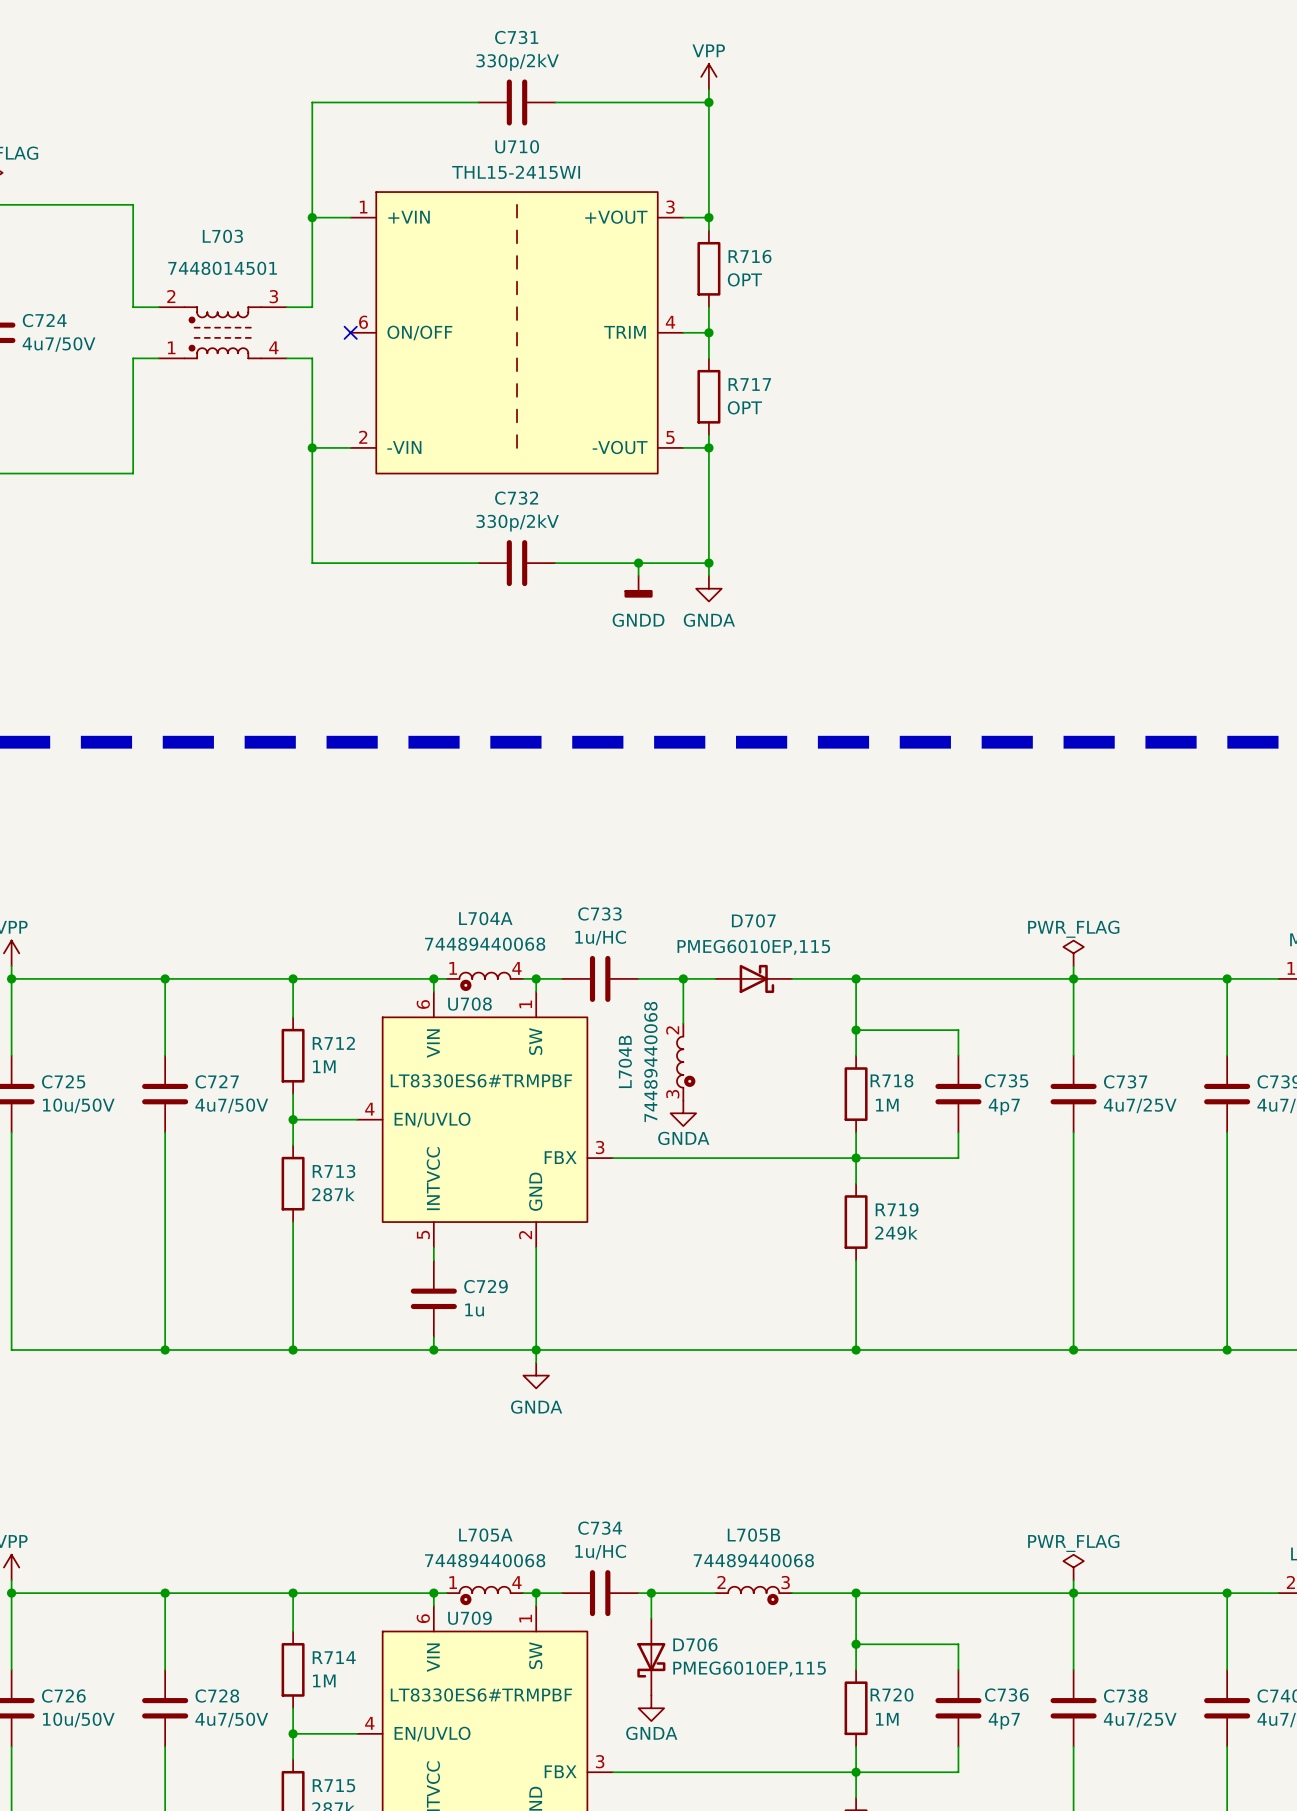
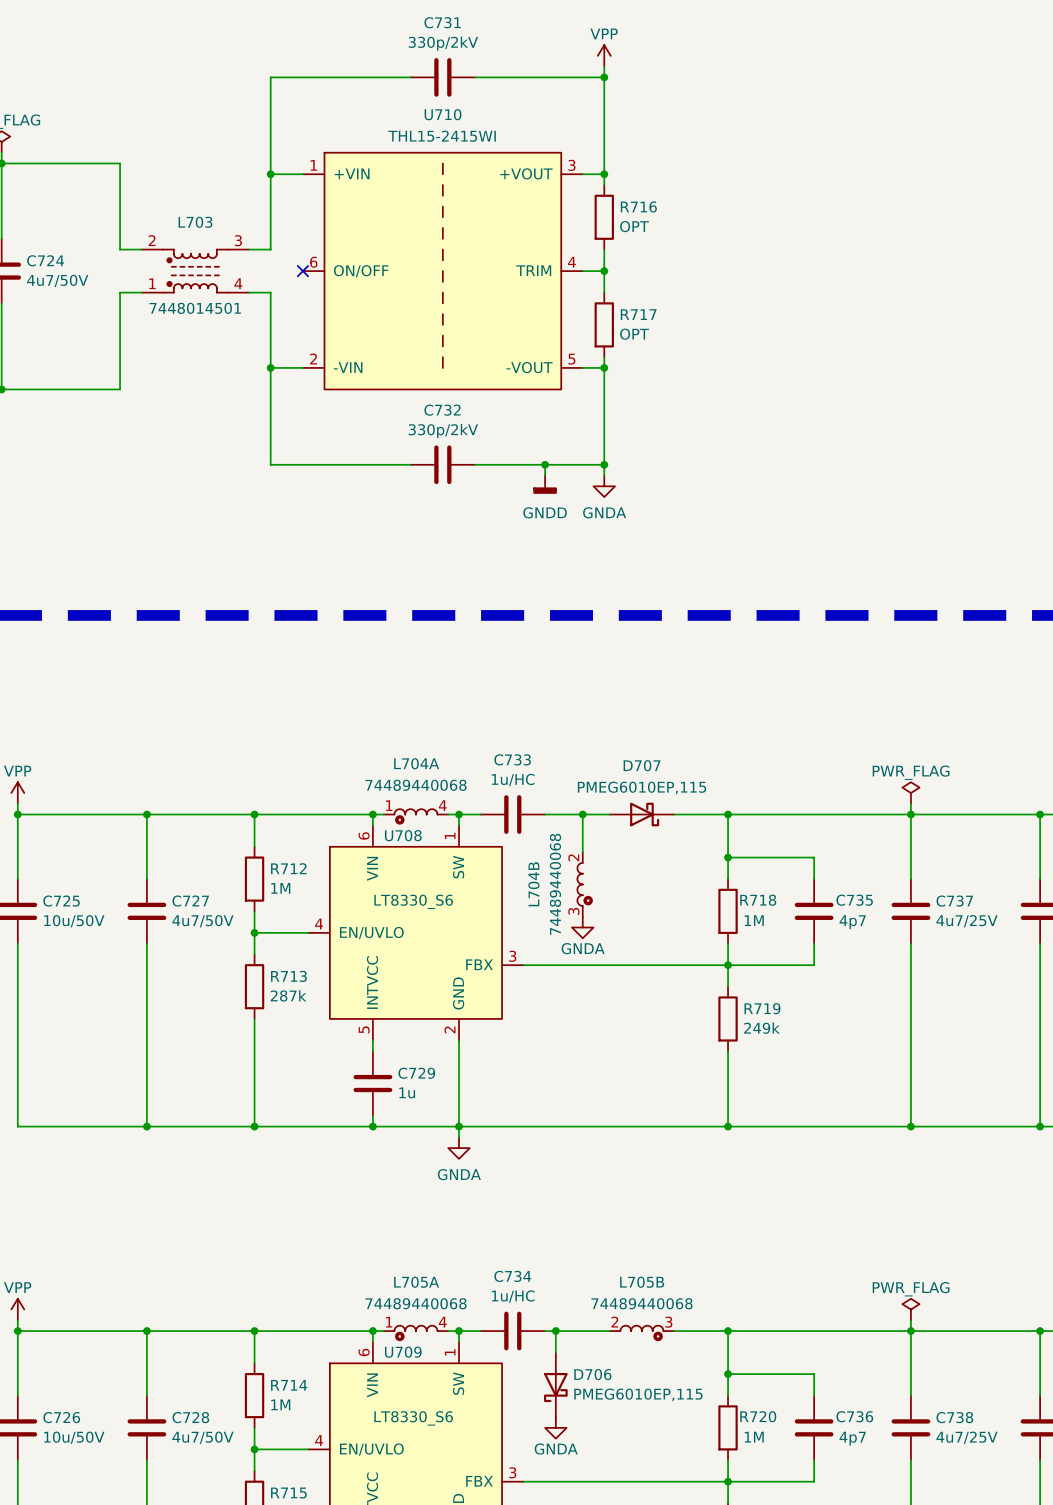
L703 name position: L703 (222, 236) -> L703 (195, 222)
L703 value position: 7448014501 (222, 268) -> 7448014501 (195, 308)
U708 value: LT8330ES6#TRMPBF (481, 1080) -> LT8330_S6 (413, 901)
U709 value: LT8330ES6#TRMPBF (481, 1695) -> LT8330_S6 (413, 1418)

